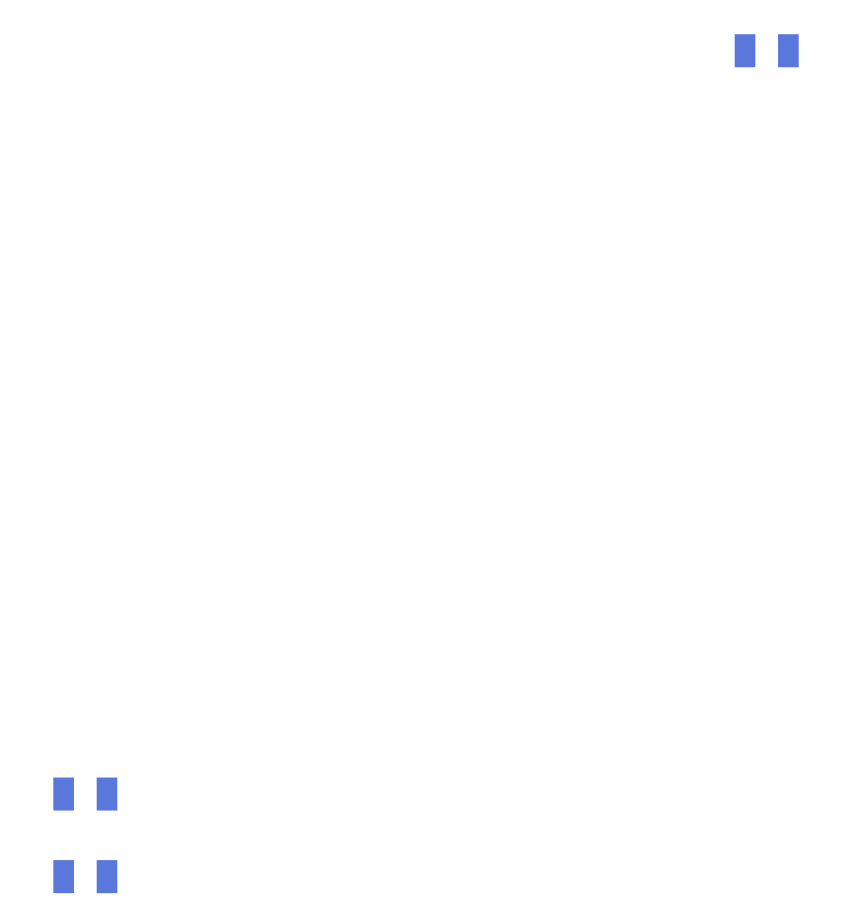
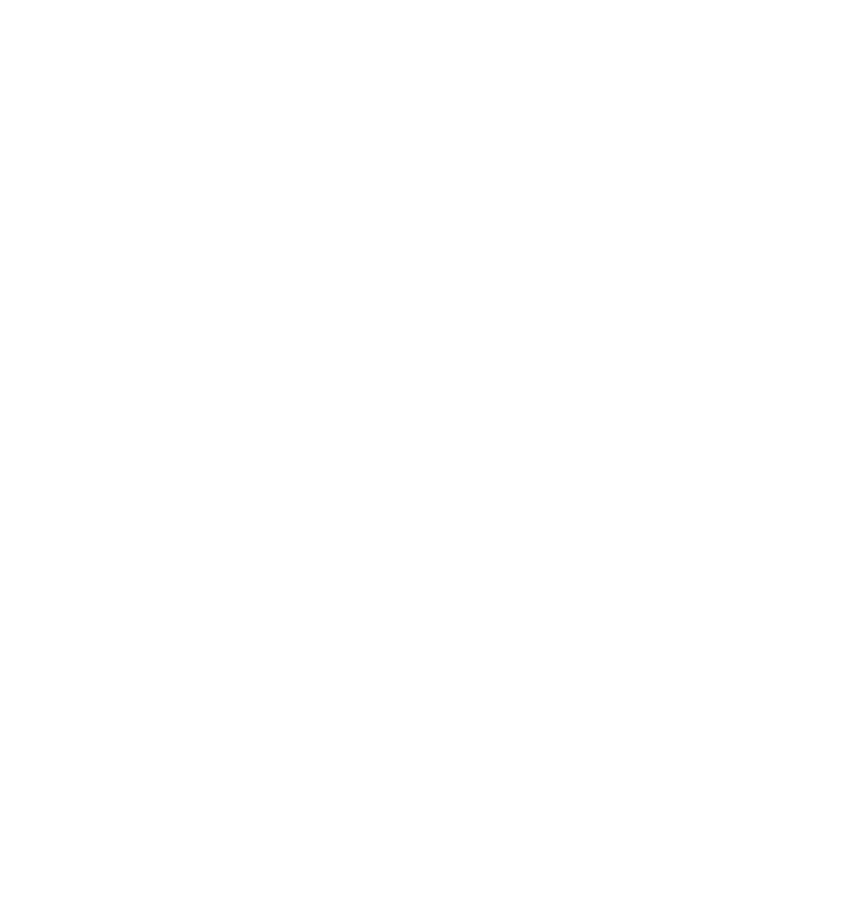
part: (766, 50) -> none
part: (85, 794) -> none
part: (85, 876) -> none

